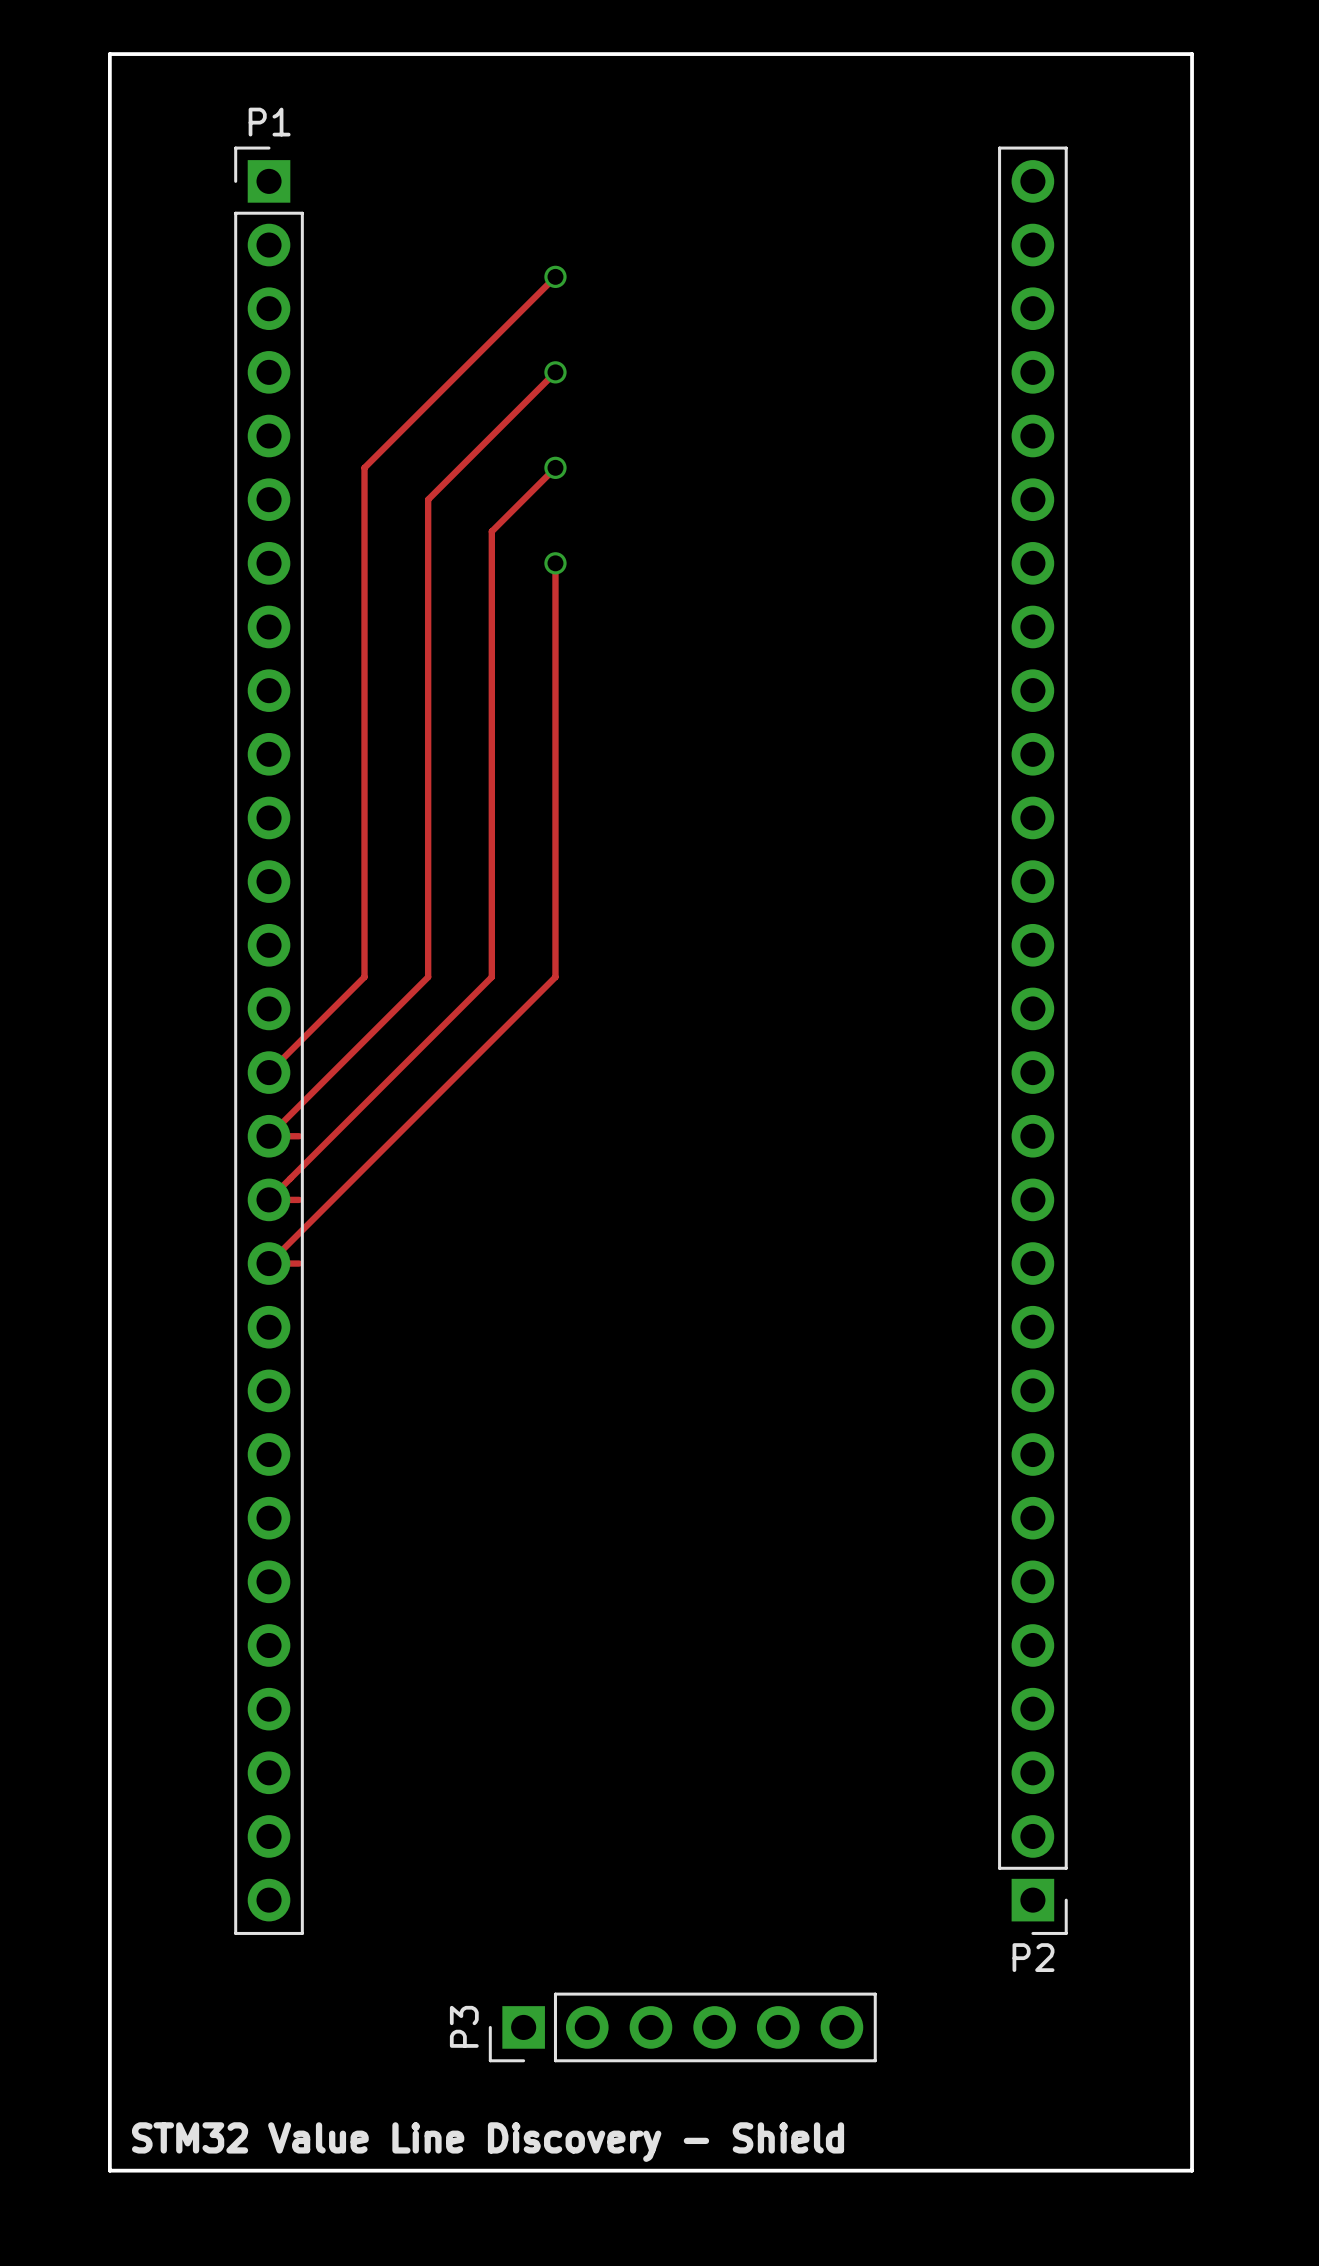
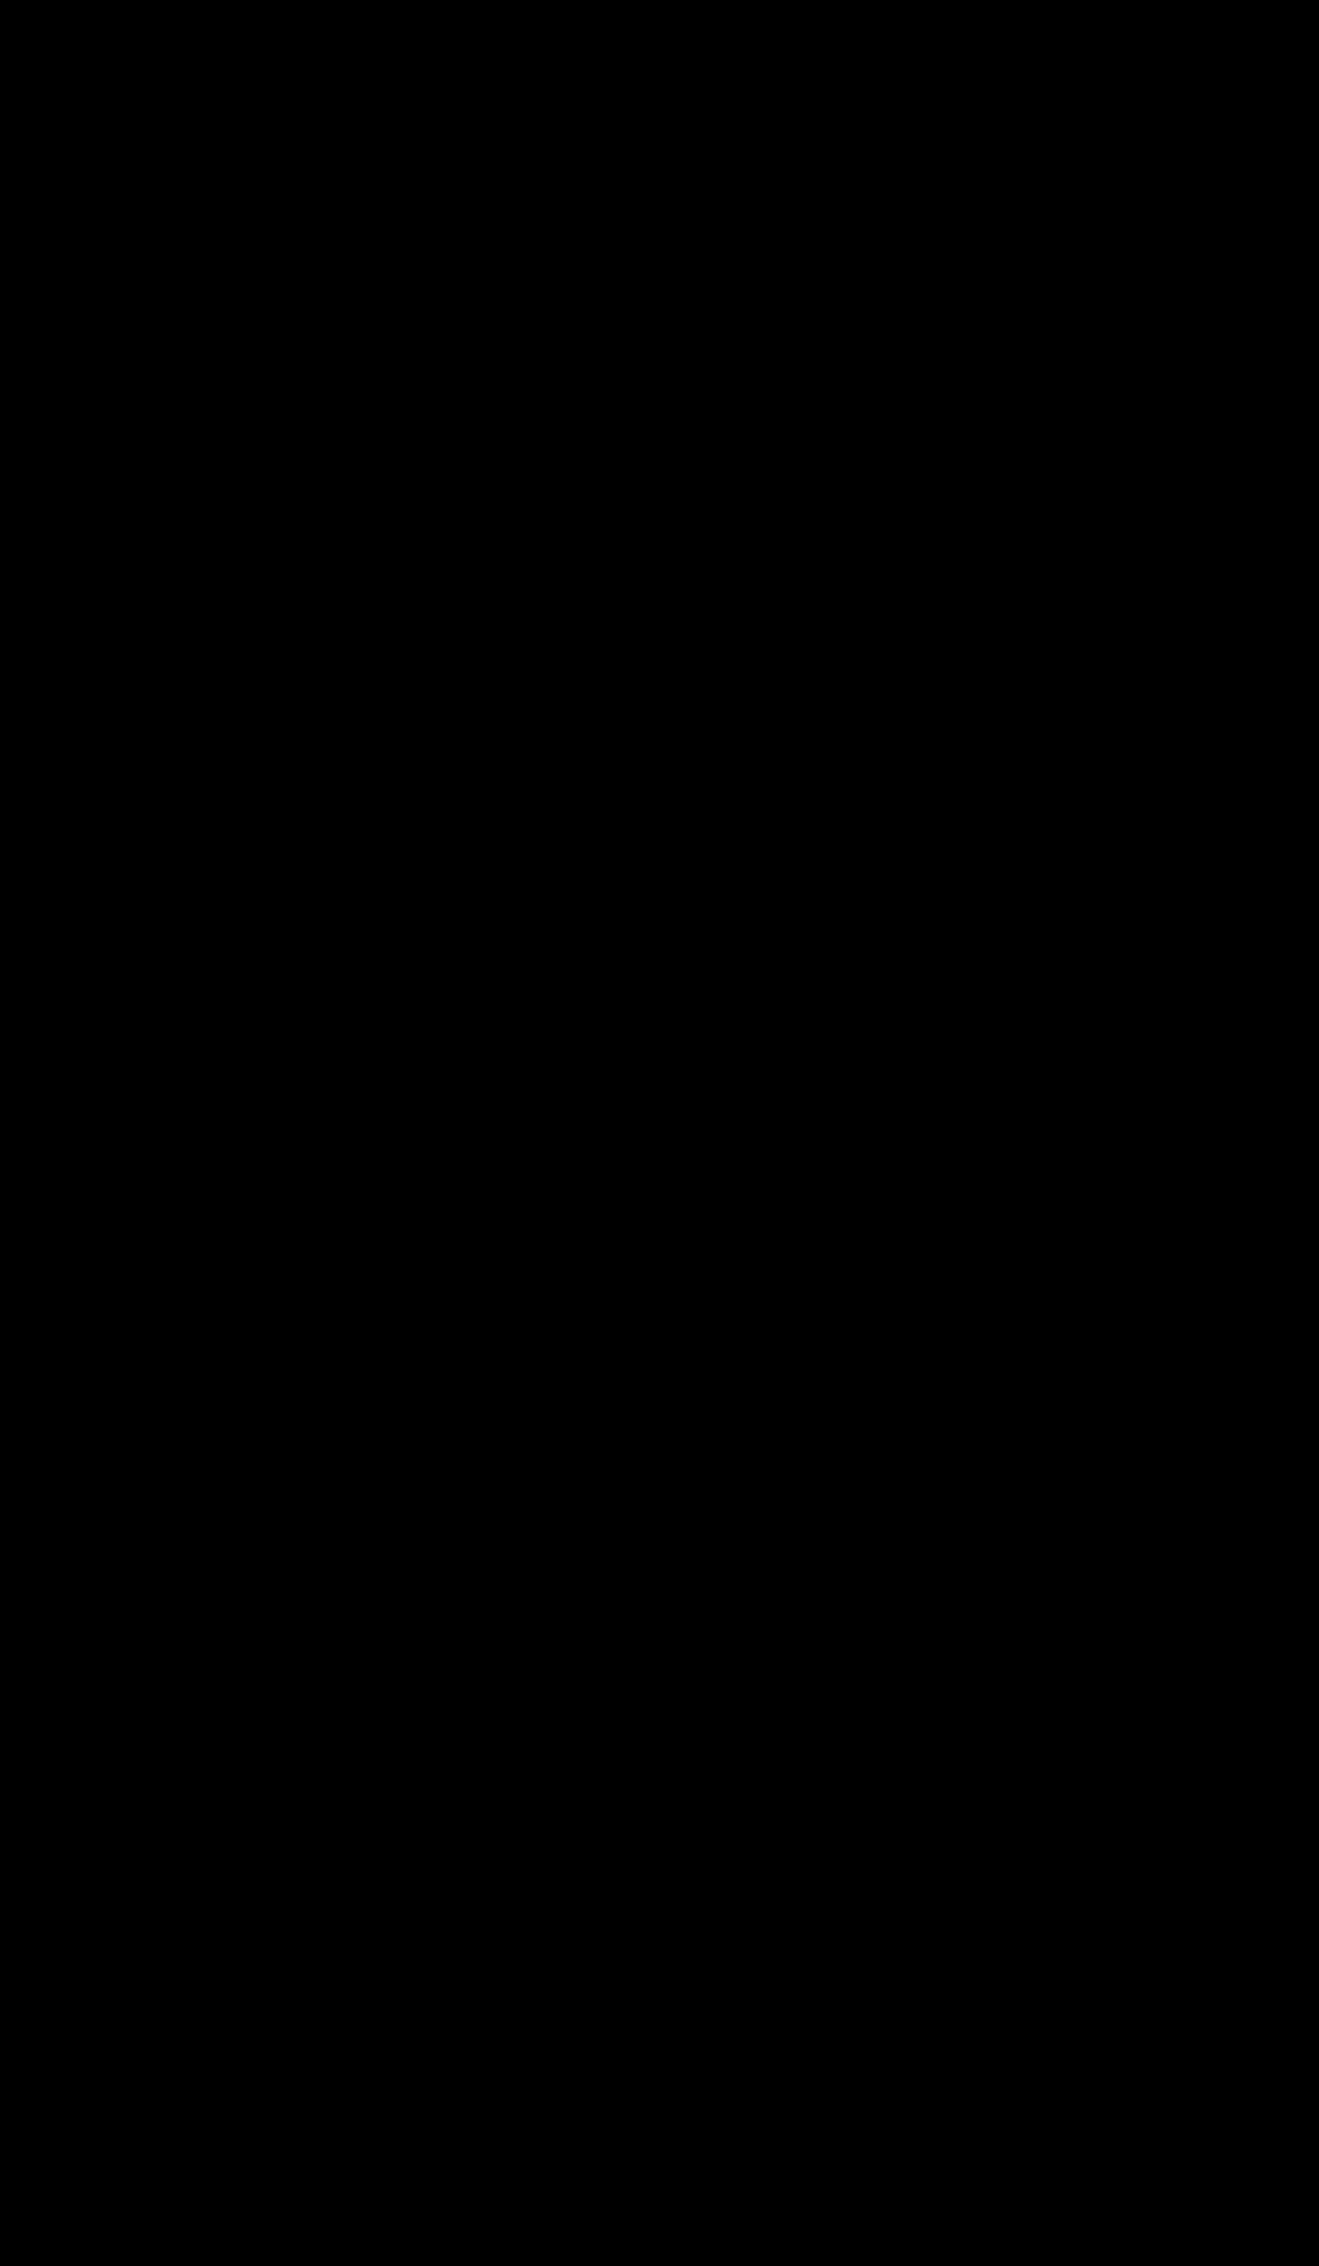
board edge: (109, 54) (109, 2170) (1192, 2170) (1192, 54) (109, 54) -> none
track: (555, 276) (364, 467) (364, 977) (269, 1072) -> none
via: (555, 276) -> none
track: (555, 372) (428, 499) (428, 977) (269, 1136) (299, 1136) -> none
via: (555, 372) -> none
track: (555, 467) (491, 531) (491, 977) (269, 1199) (299, 1199) -> none
via: (555, 467) -> none
track: (555, 563) (555, 977) (269, 1263) (299, 1263) -> none
via: (555, 563) -> none
P1: (269, 1040) -> none
P2: (1032, 1040) -> none
P3: (682, 2027) -> none
text: STM32 Value Line Discovery - Shield (488, 2142) -> none

